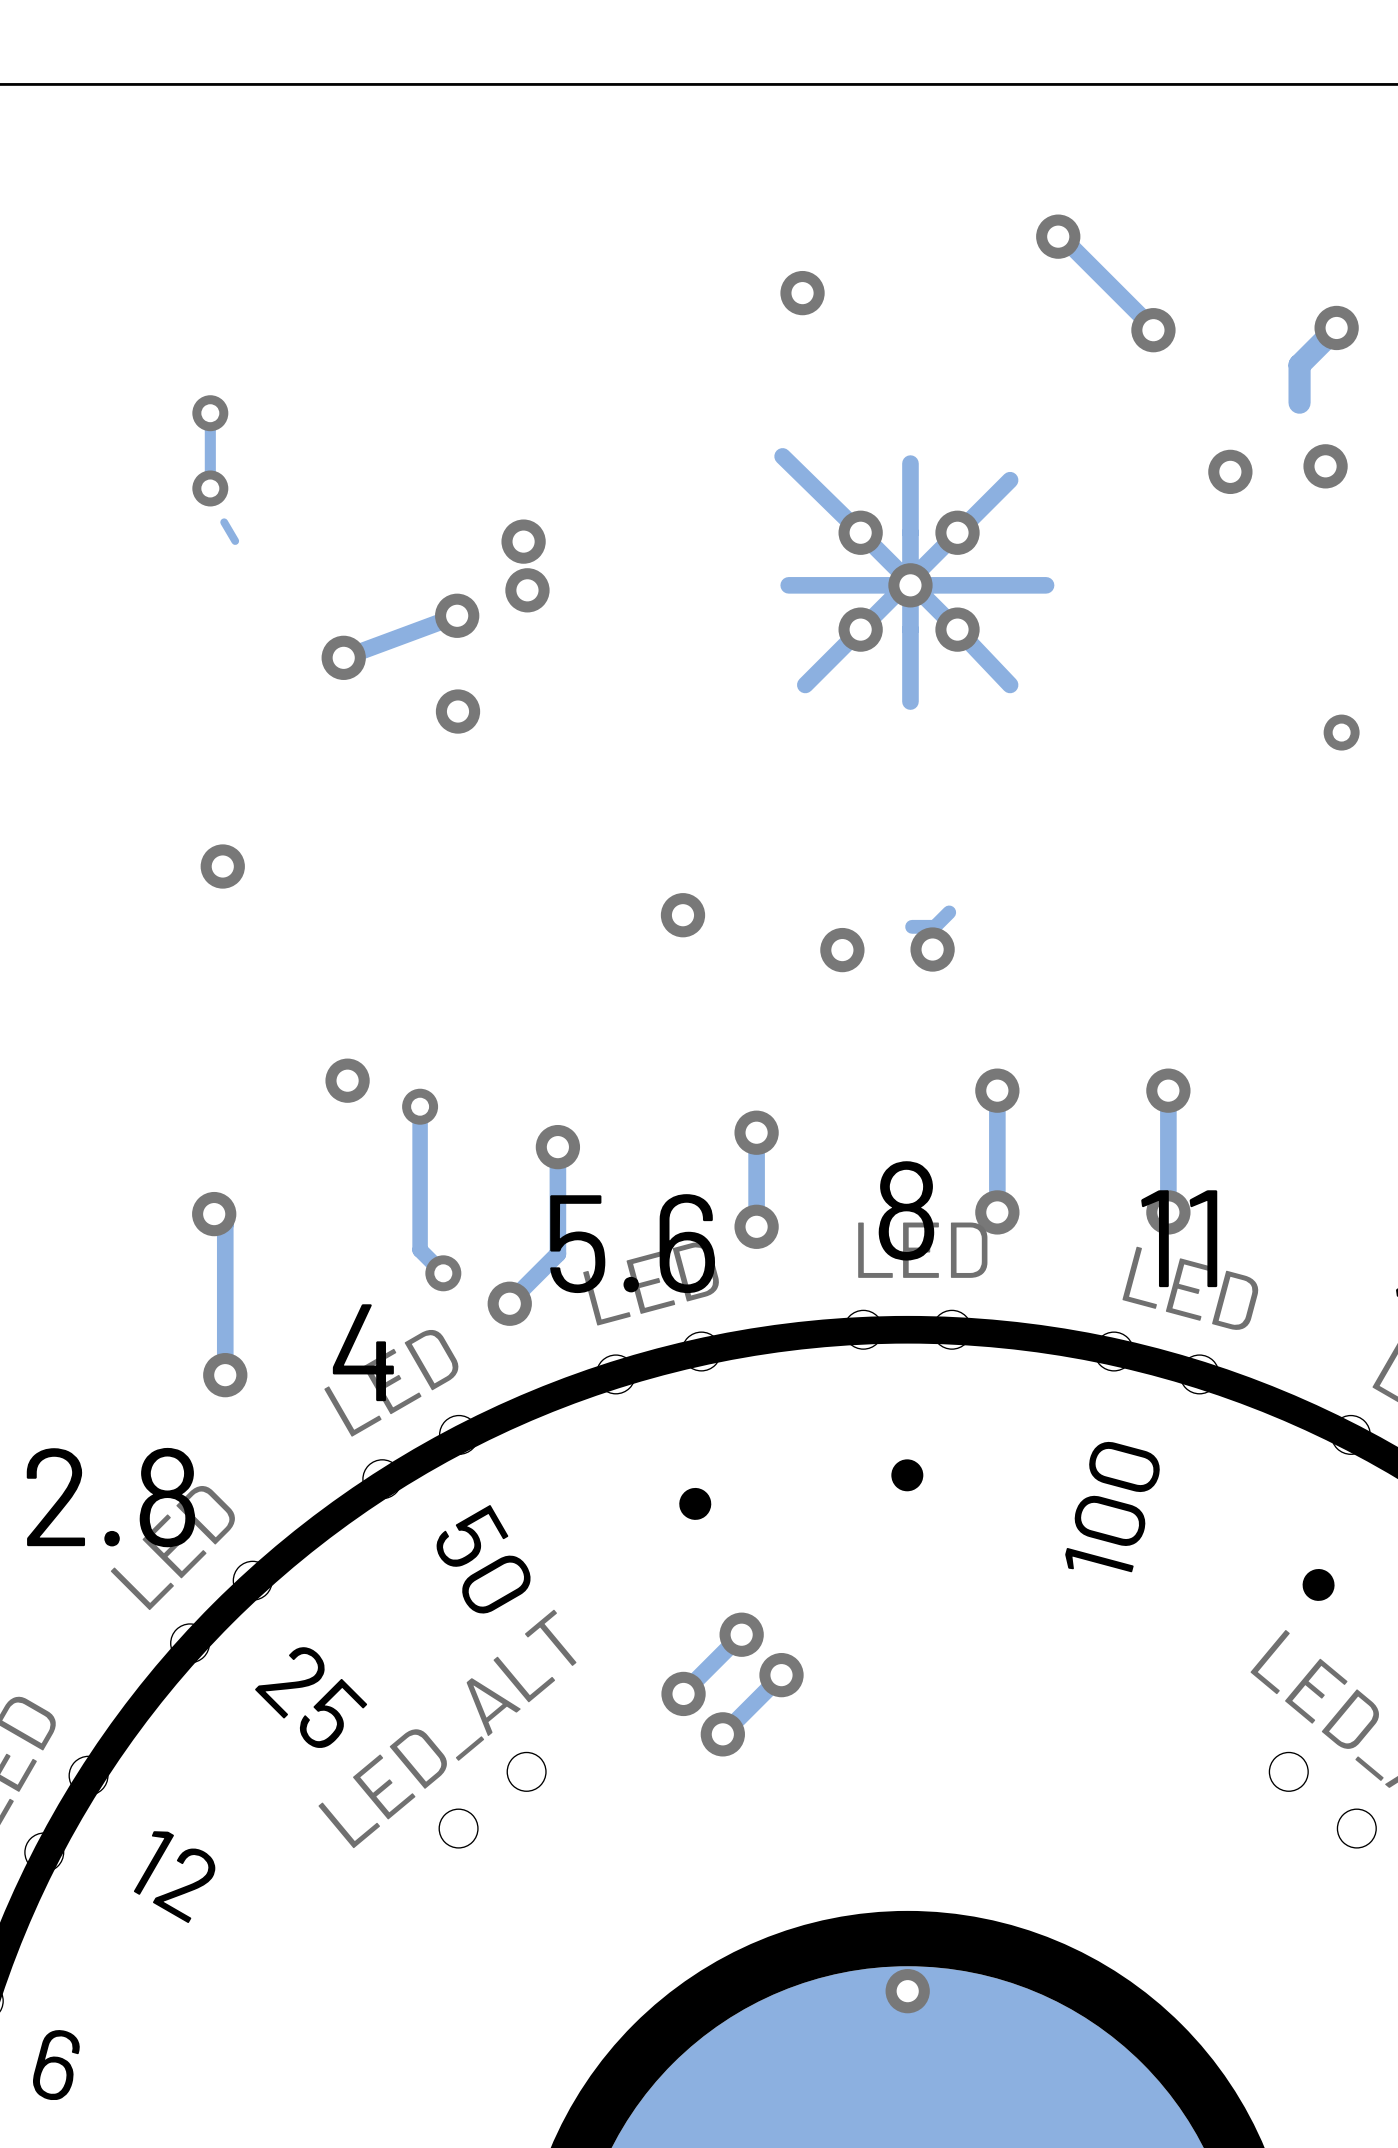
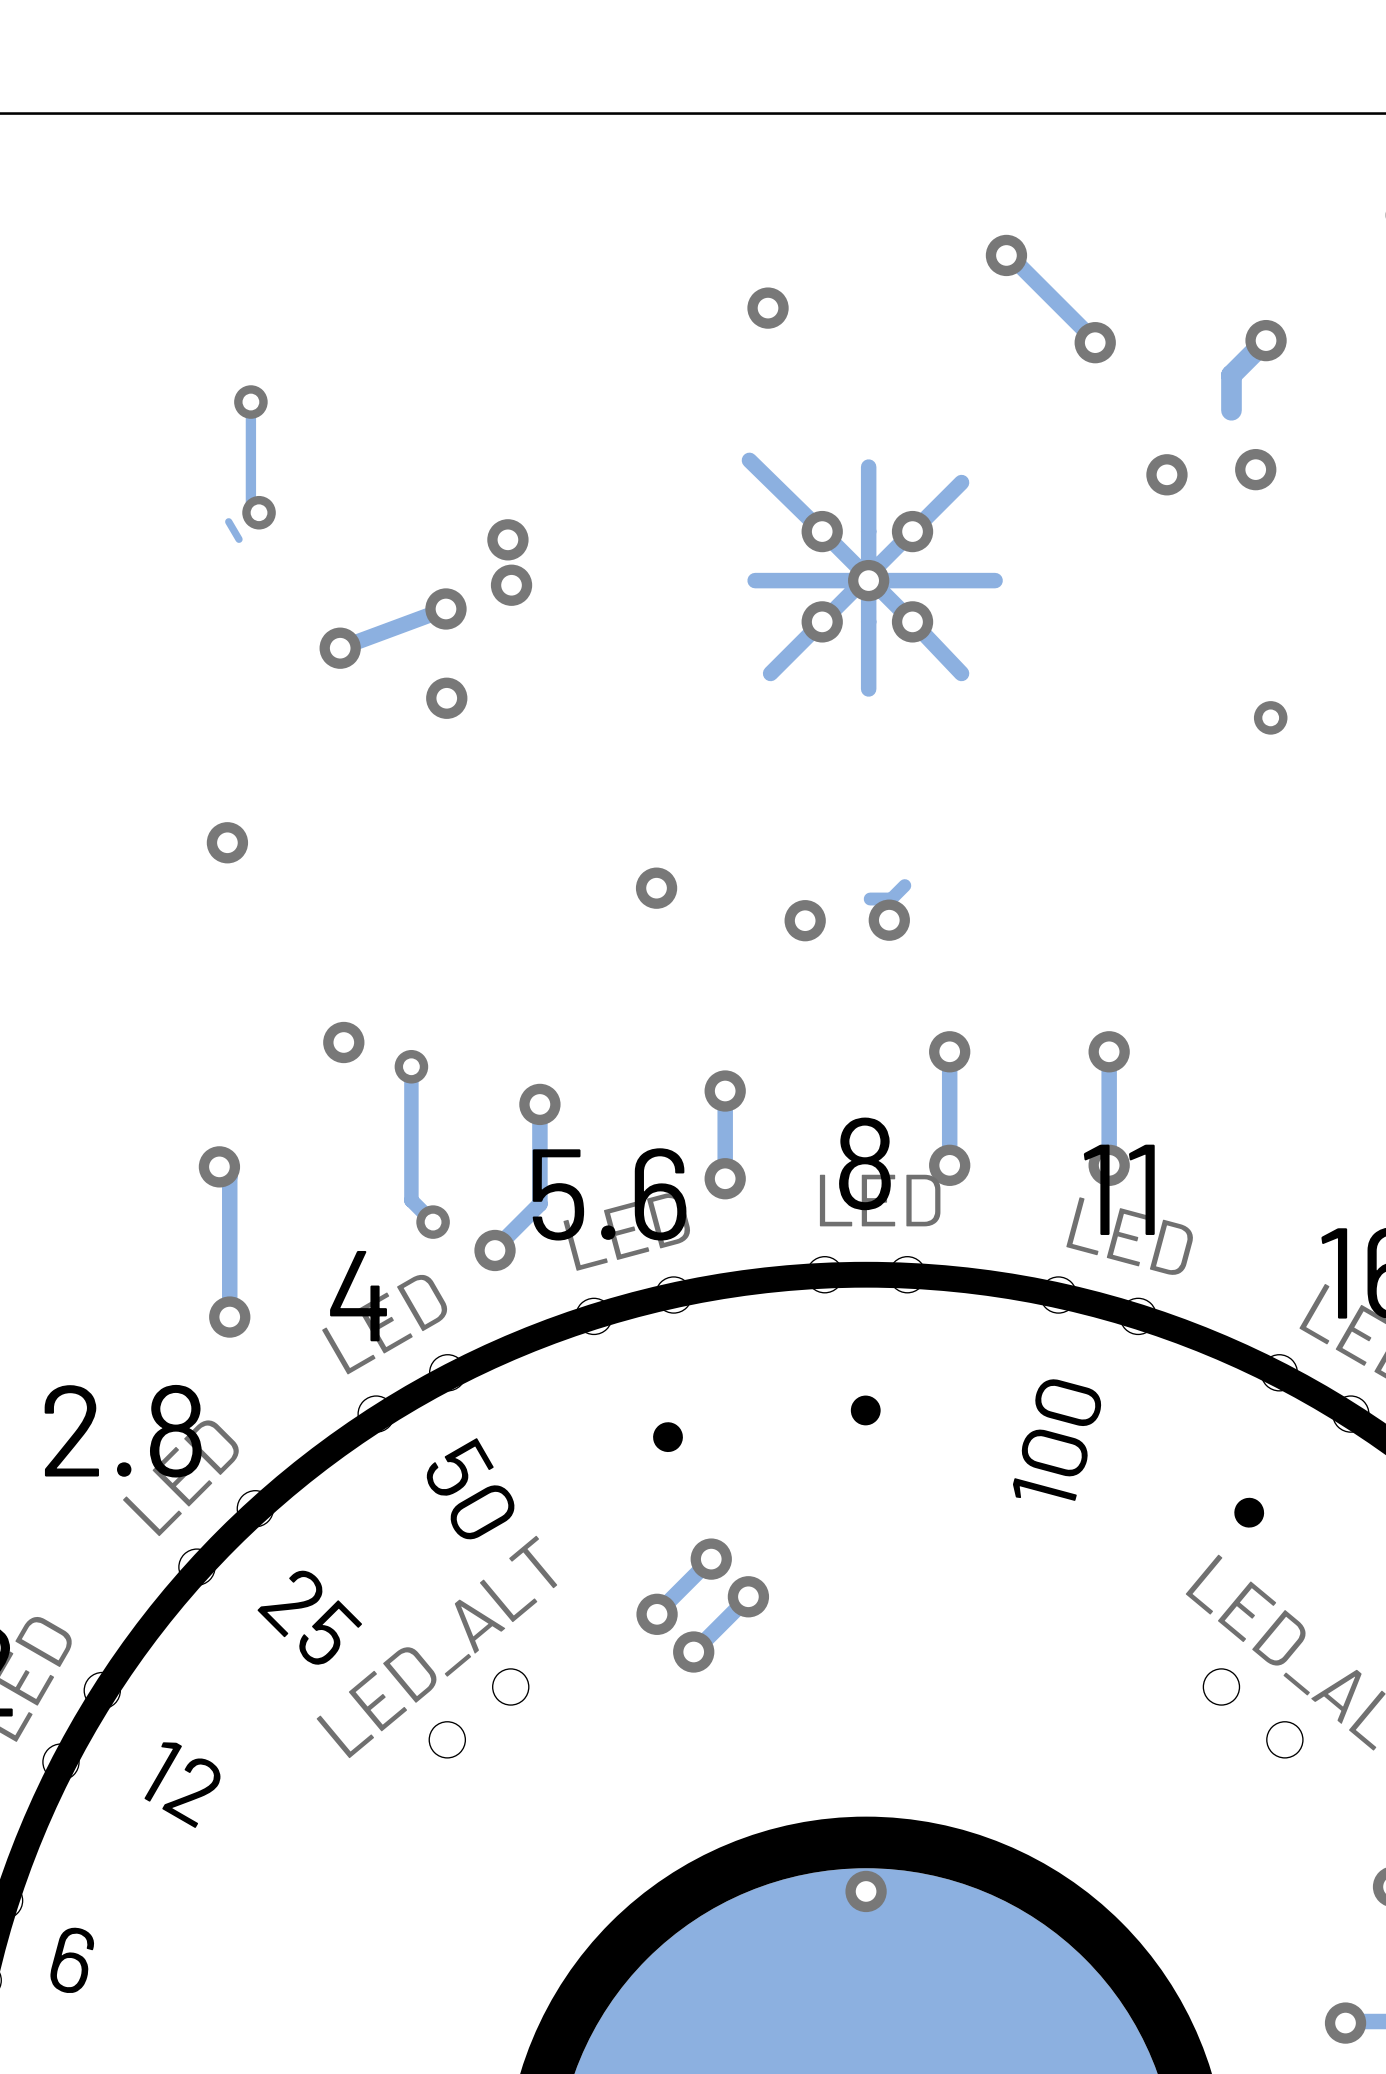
track: none -> (250, 402) (250, 504) (259, 512)
track: (210, 413) (210, 488) -> none
via position: (210, 413) -> (250, 402)
via: (210, 488) -> none
via: none -> (259, 512)

